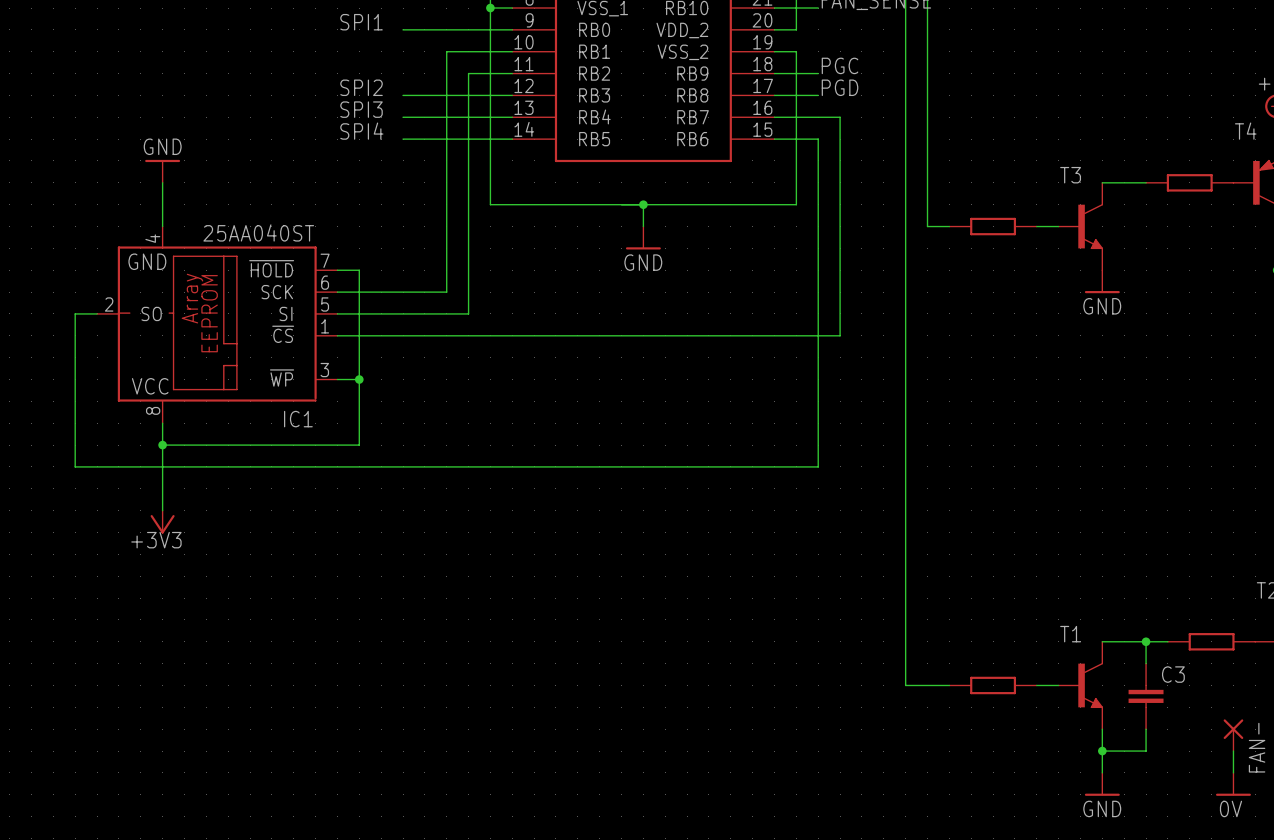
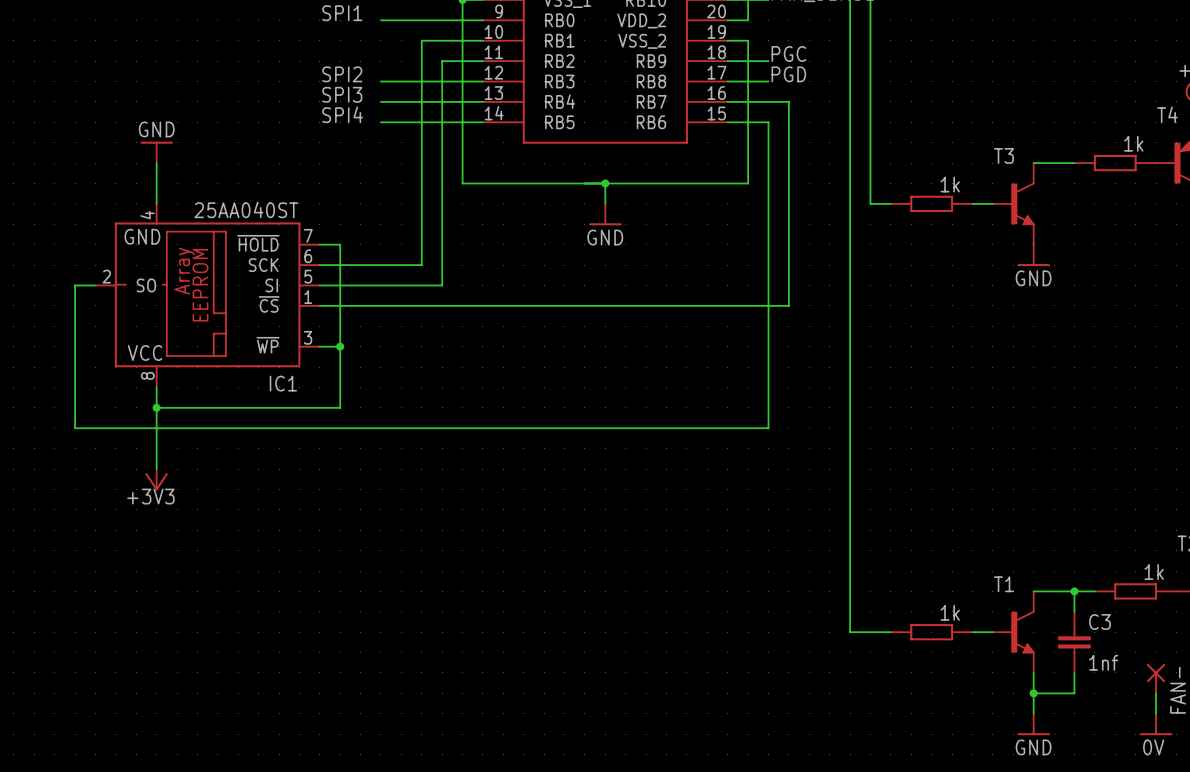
part value: none -> 1k (1133, 143)
part value: none -> 1k (950, 184)
part value: none -> 1k (1154, 572)
part value: none -> 1k (950, 612)
C3 value: none -> 1nf (1103, 662)

